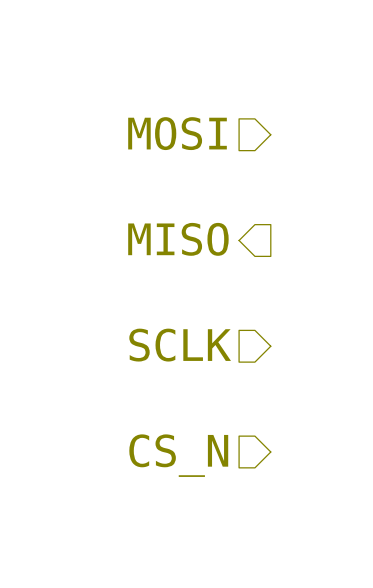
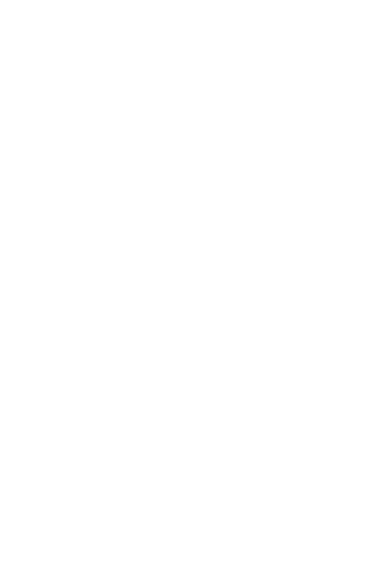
hierarchical label: MOSI (177, 133) -> none
hierarchical label: MISO (178, 239) -> none
hierarchical label: SCLK (180, 345) -> none
hierarchical label: CS_N (178, 455) -> none

